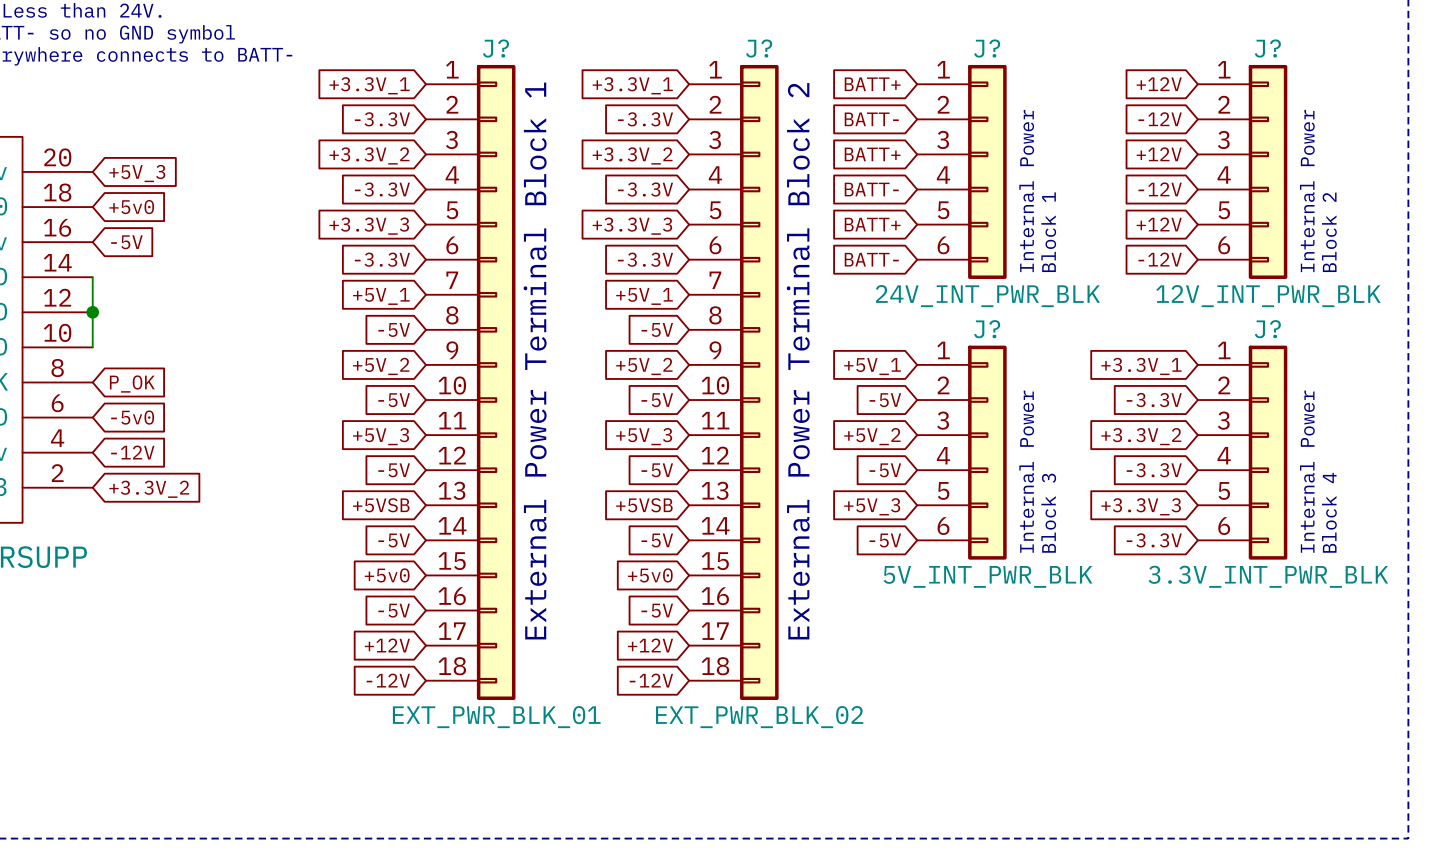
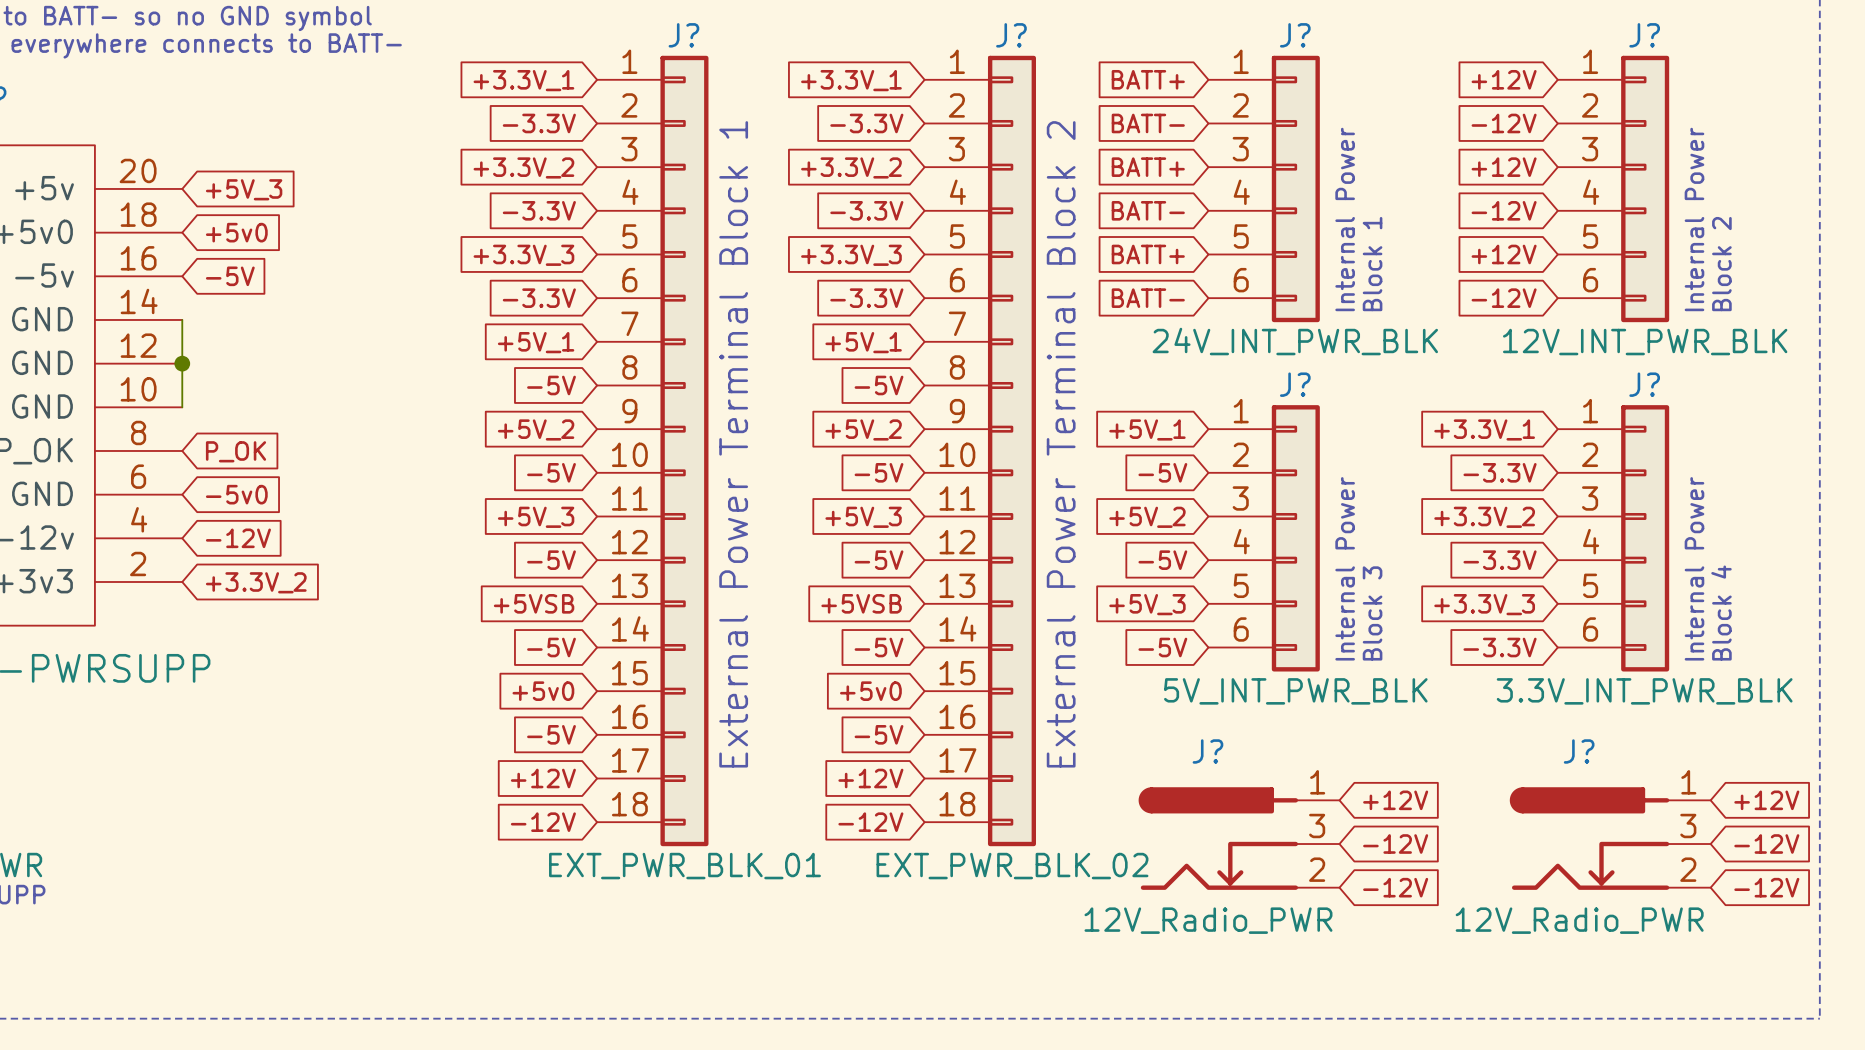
global label: none -> +12V (1395, 800)
global label: none -> +12V (1766, 800)
J?: none -> 12V_Radio_PWR (1239, 838)
J?: none -> 12V_Radio_PWR (1610, 838)
global label: none -> -12V (1395, 844)
global label: none -> -12V (1766, 844)
global label: none -> -12V (1395, 887)
global label: none -> -12V (1766, 887)

